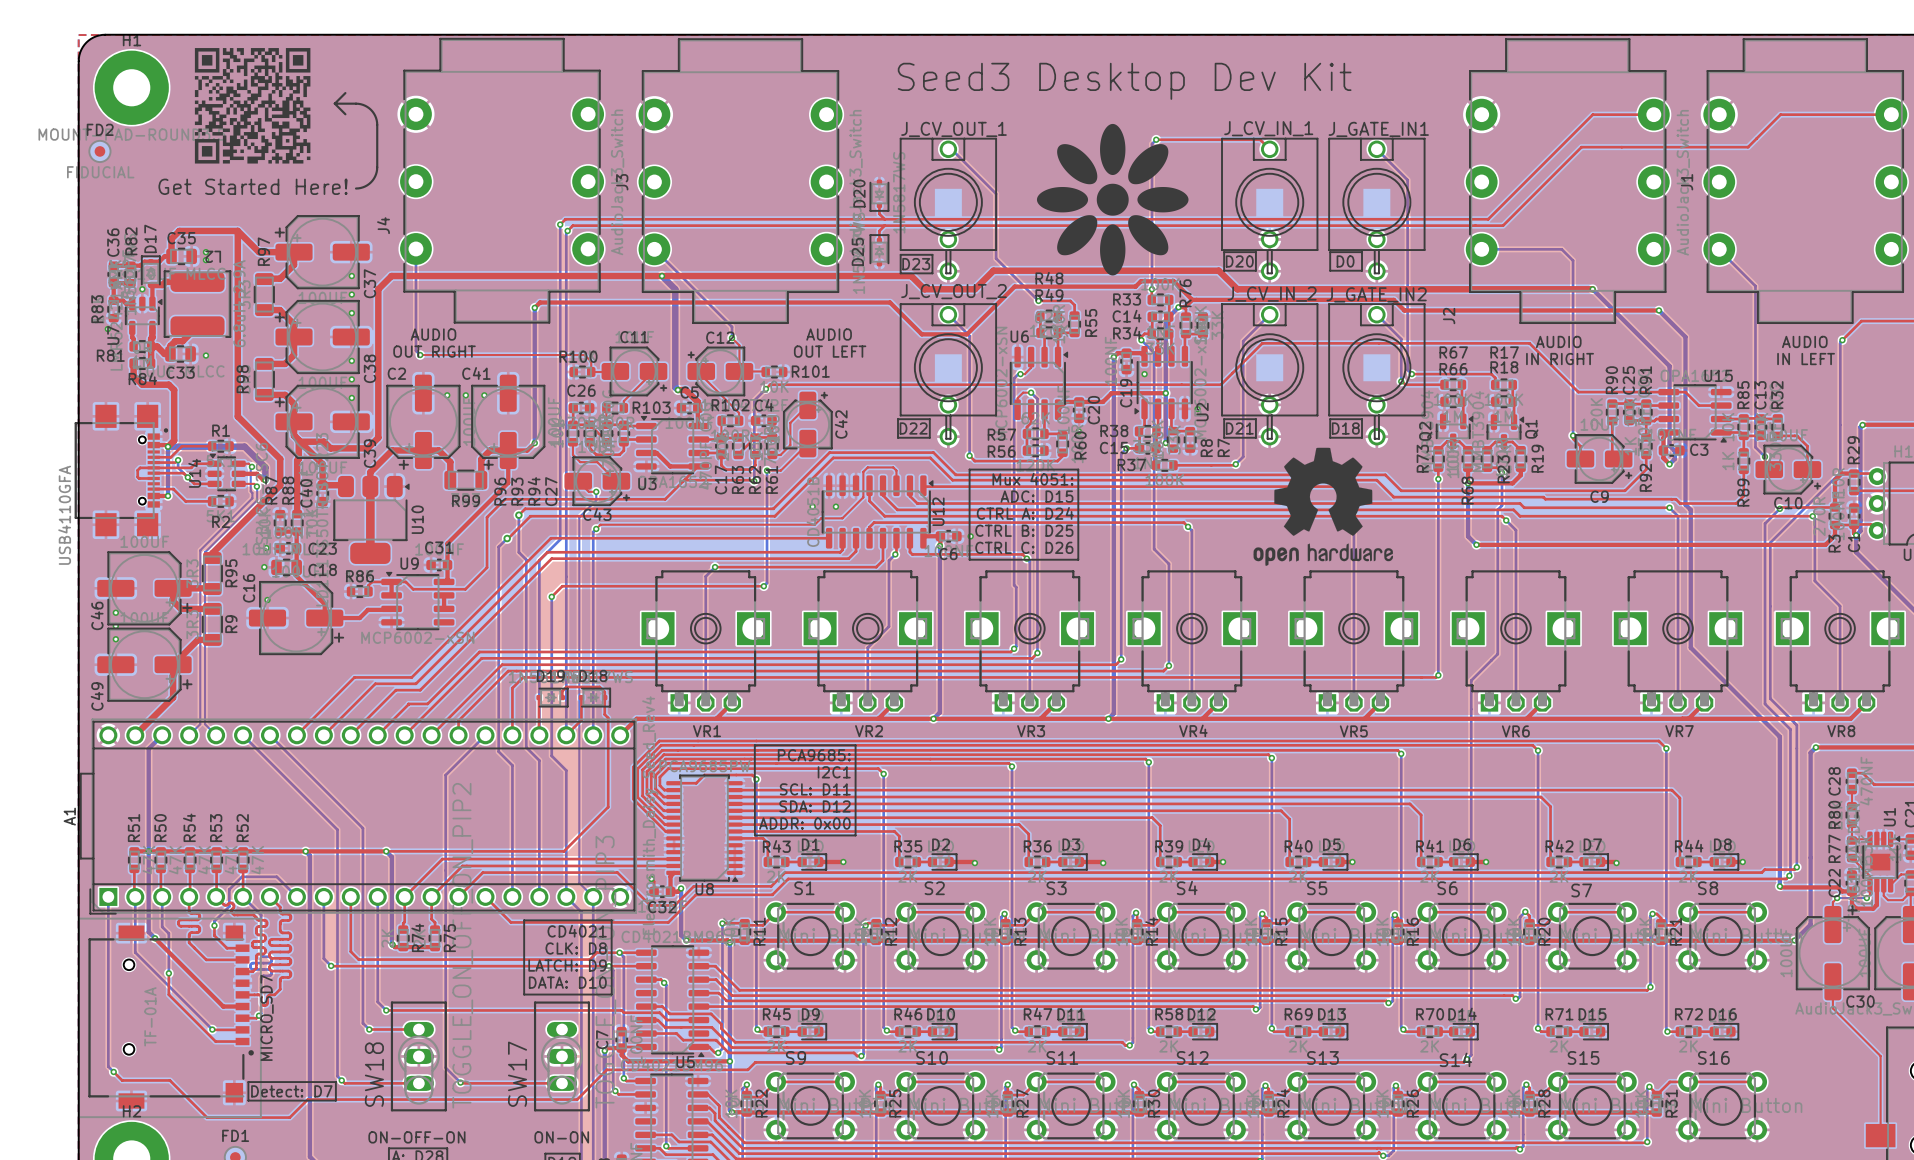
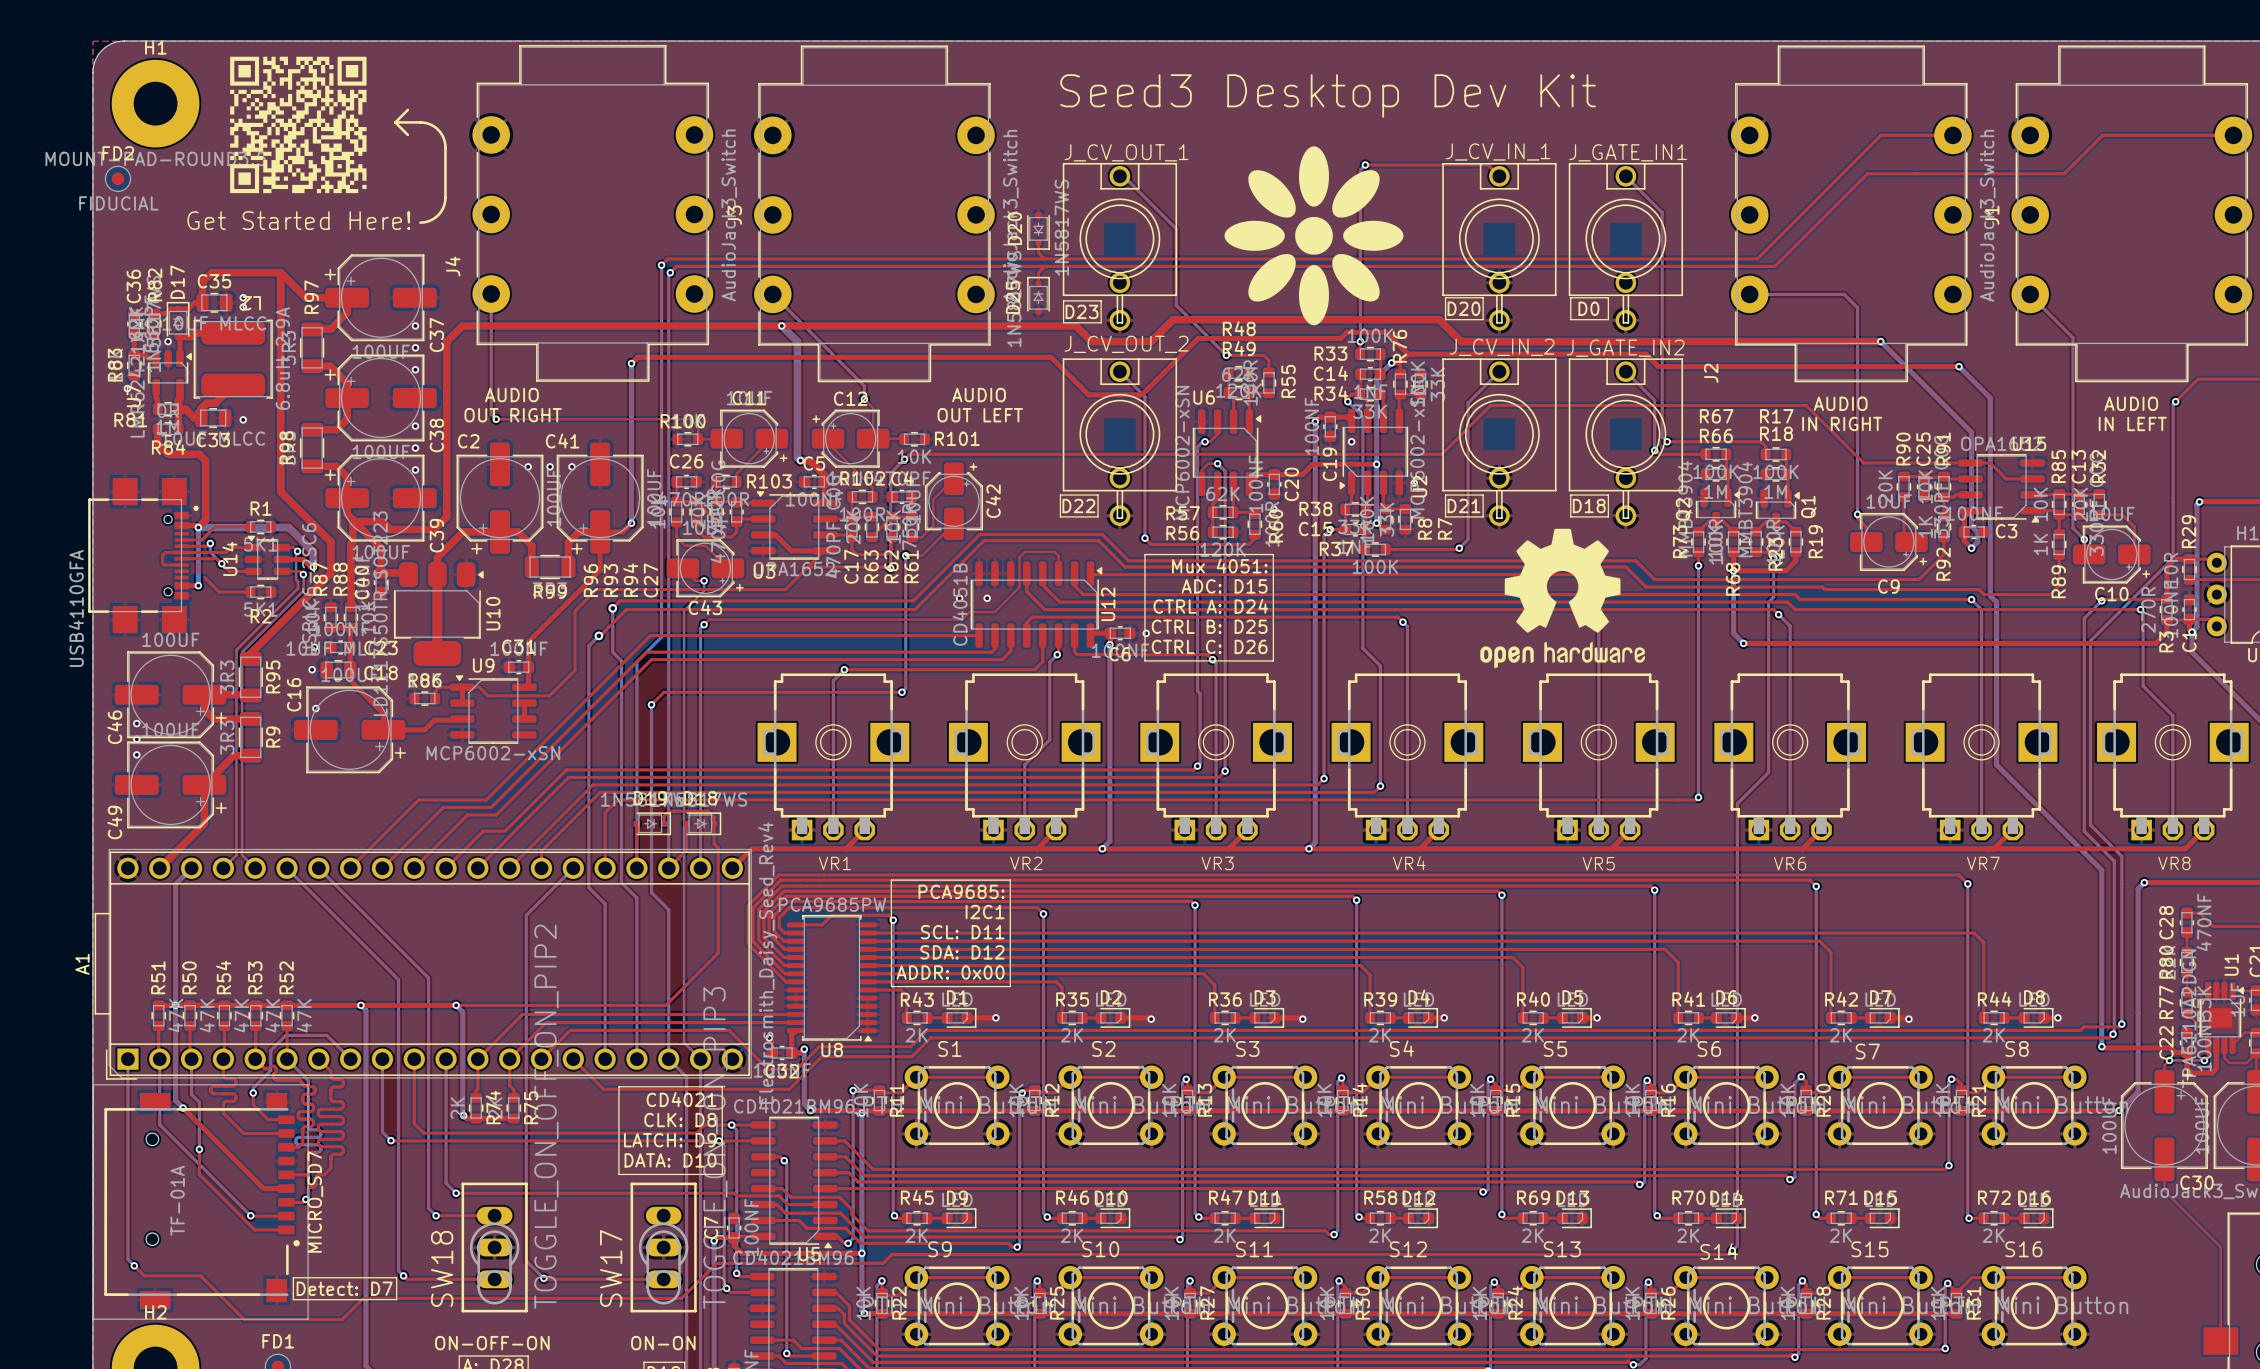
top track: (153, 489) (173, 489) -> none

